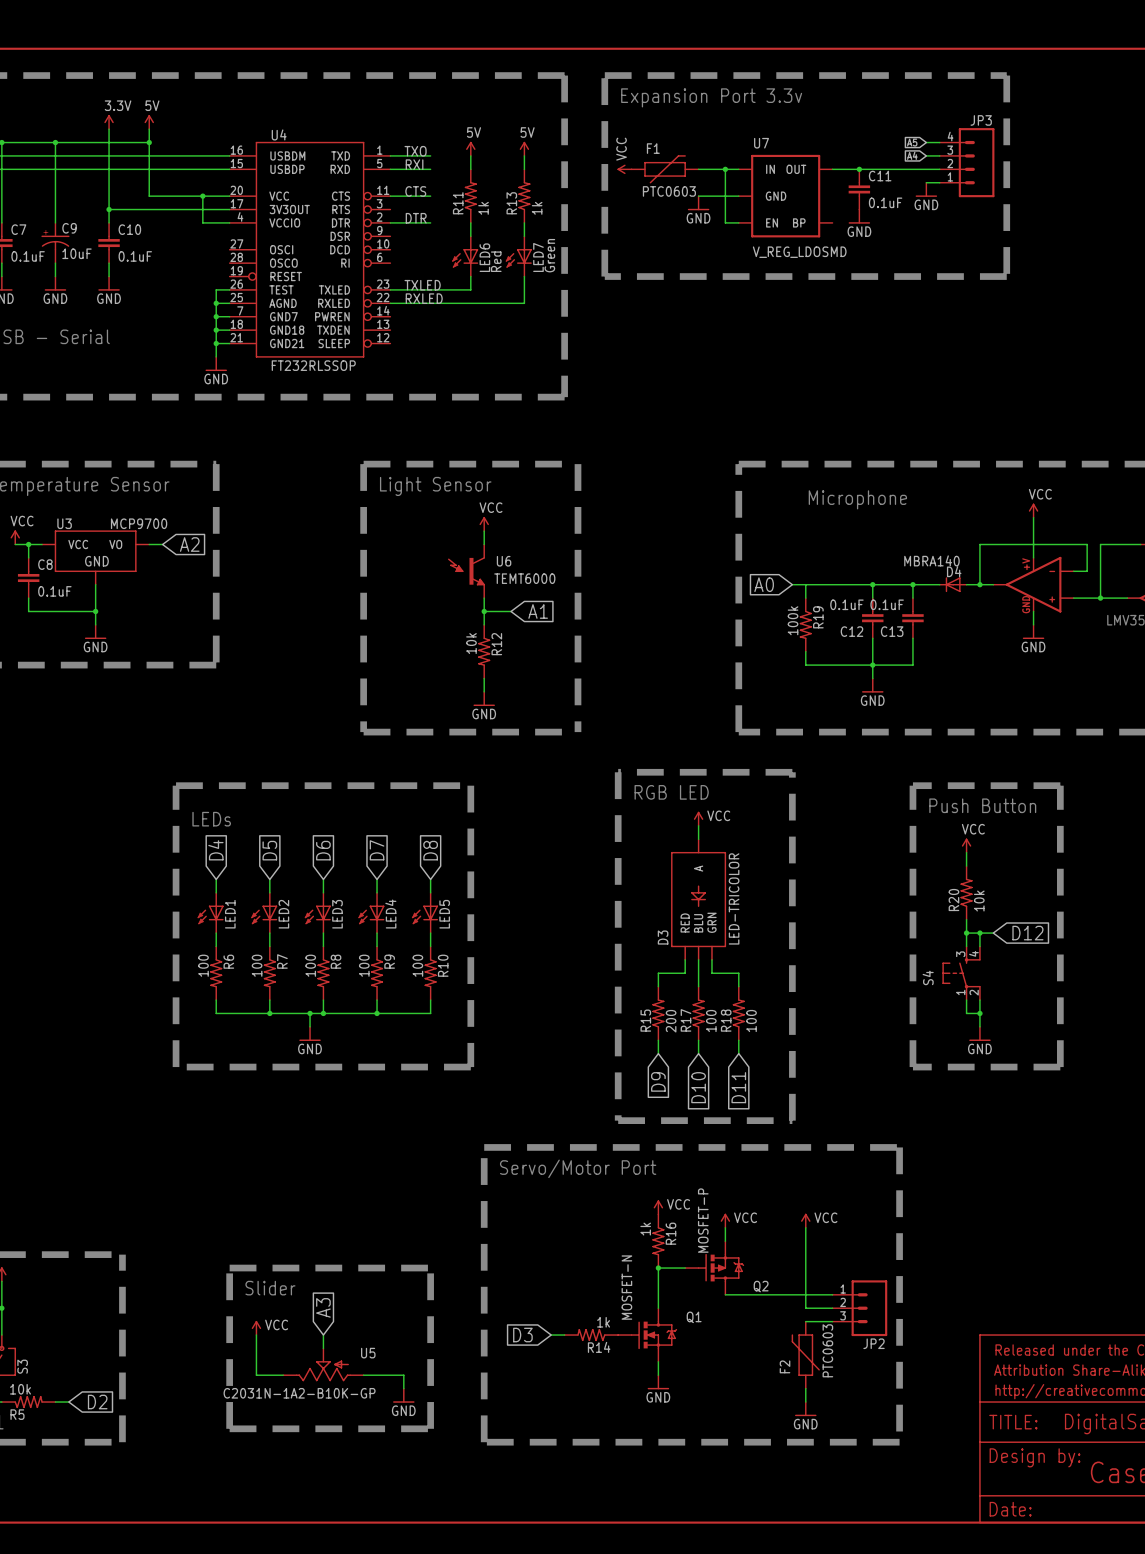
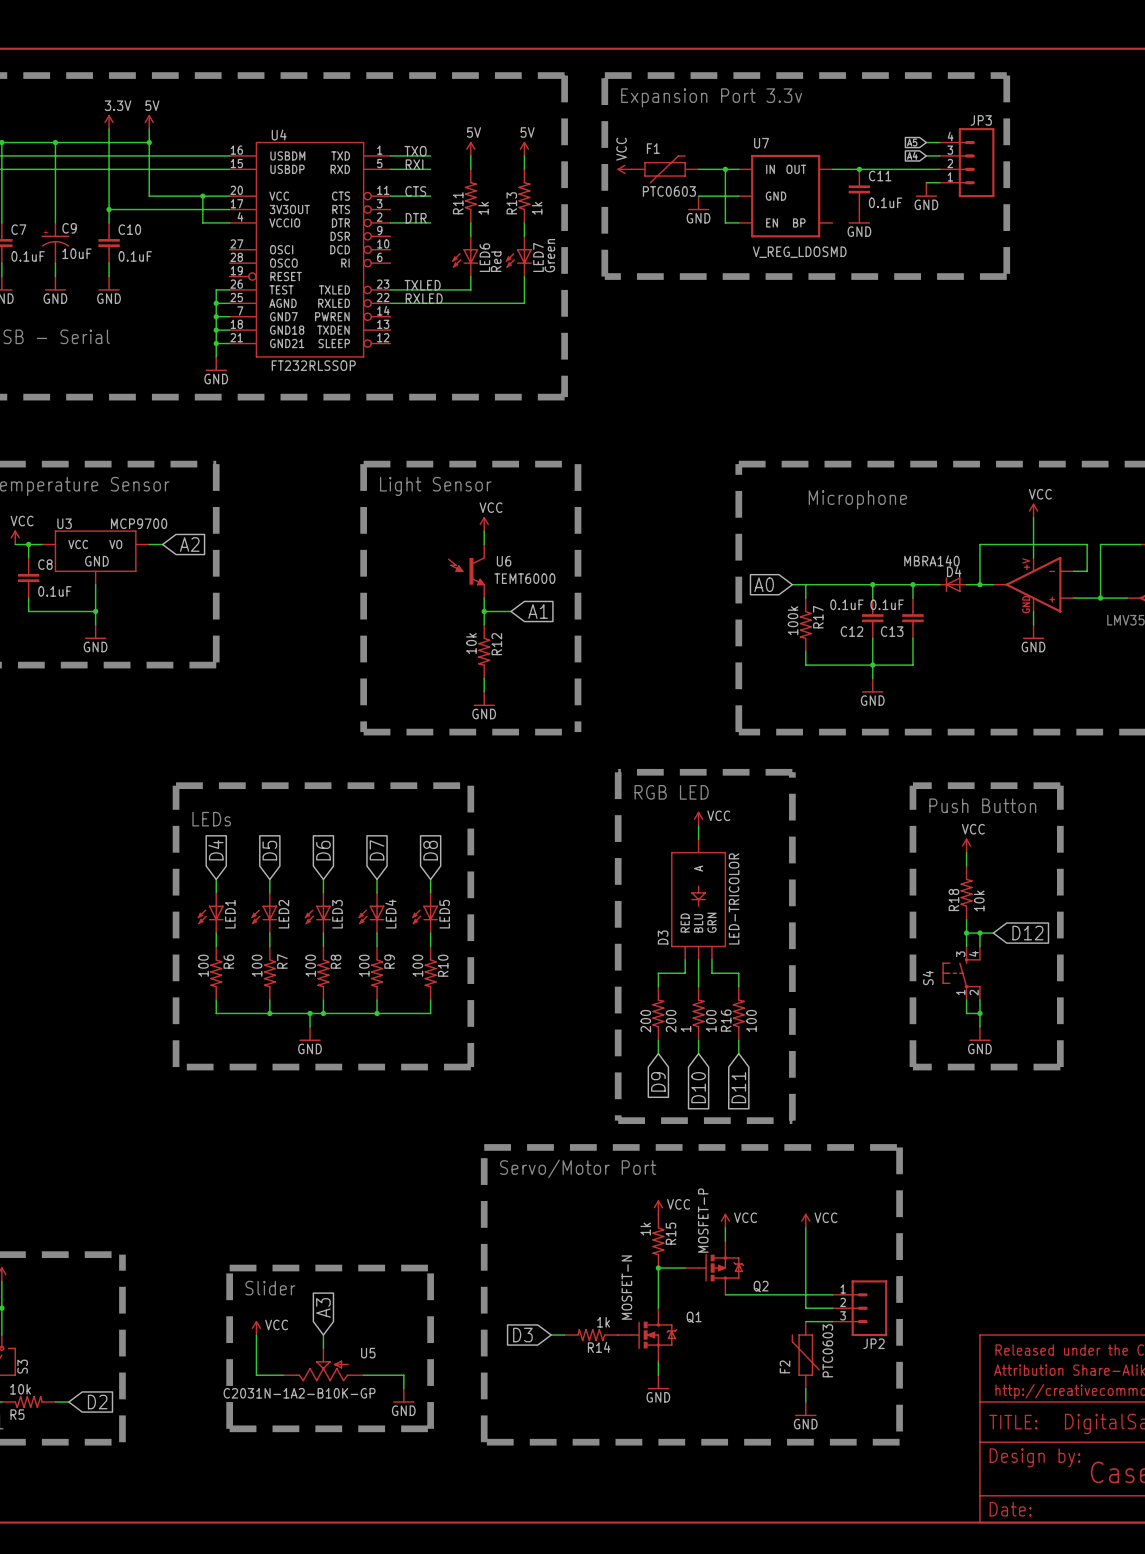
R19 name: R19 (818, 617) -> R17 (818, 617)
R20 name: R20 (953, 900) -> R18 (953, 900)
R15 name: R15 (645, 1020) -> 200 (645, 1021)
R17 name: R17 (685, 1020) -> 1 (685, 1029)
R18 name: R18 (726, 1020) -> R16 (726, 1020)
R16 name: R16 (670, 1233) -> R15 (670, 1233)

